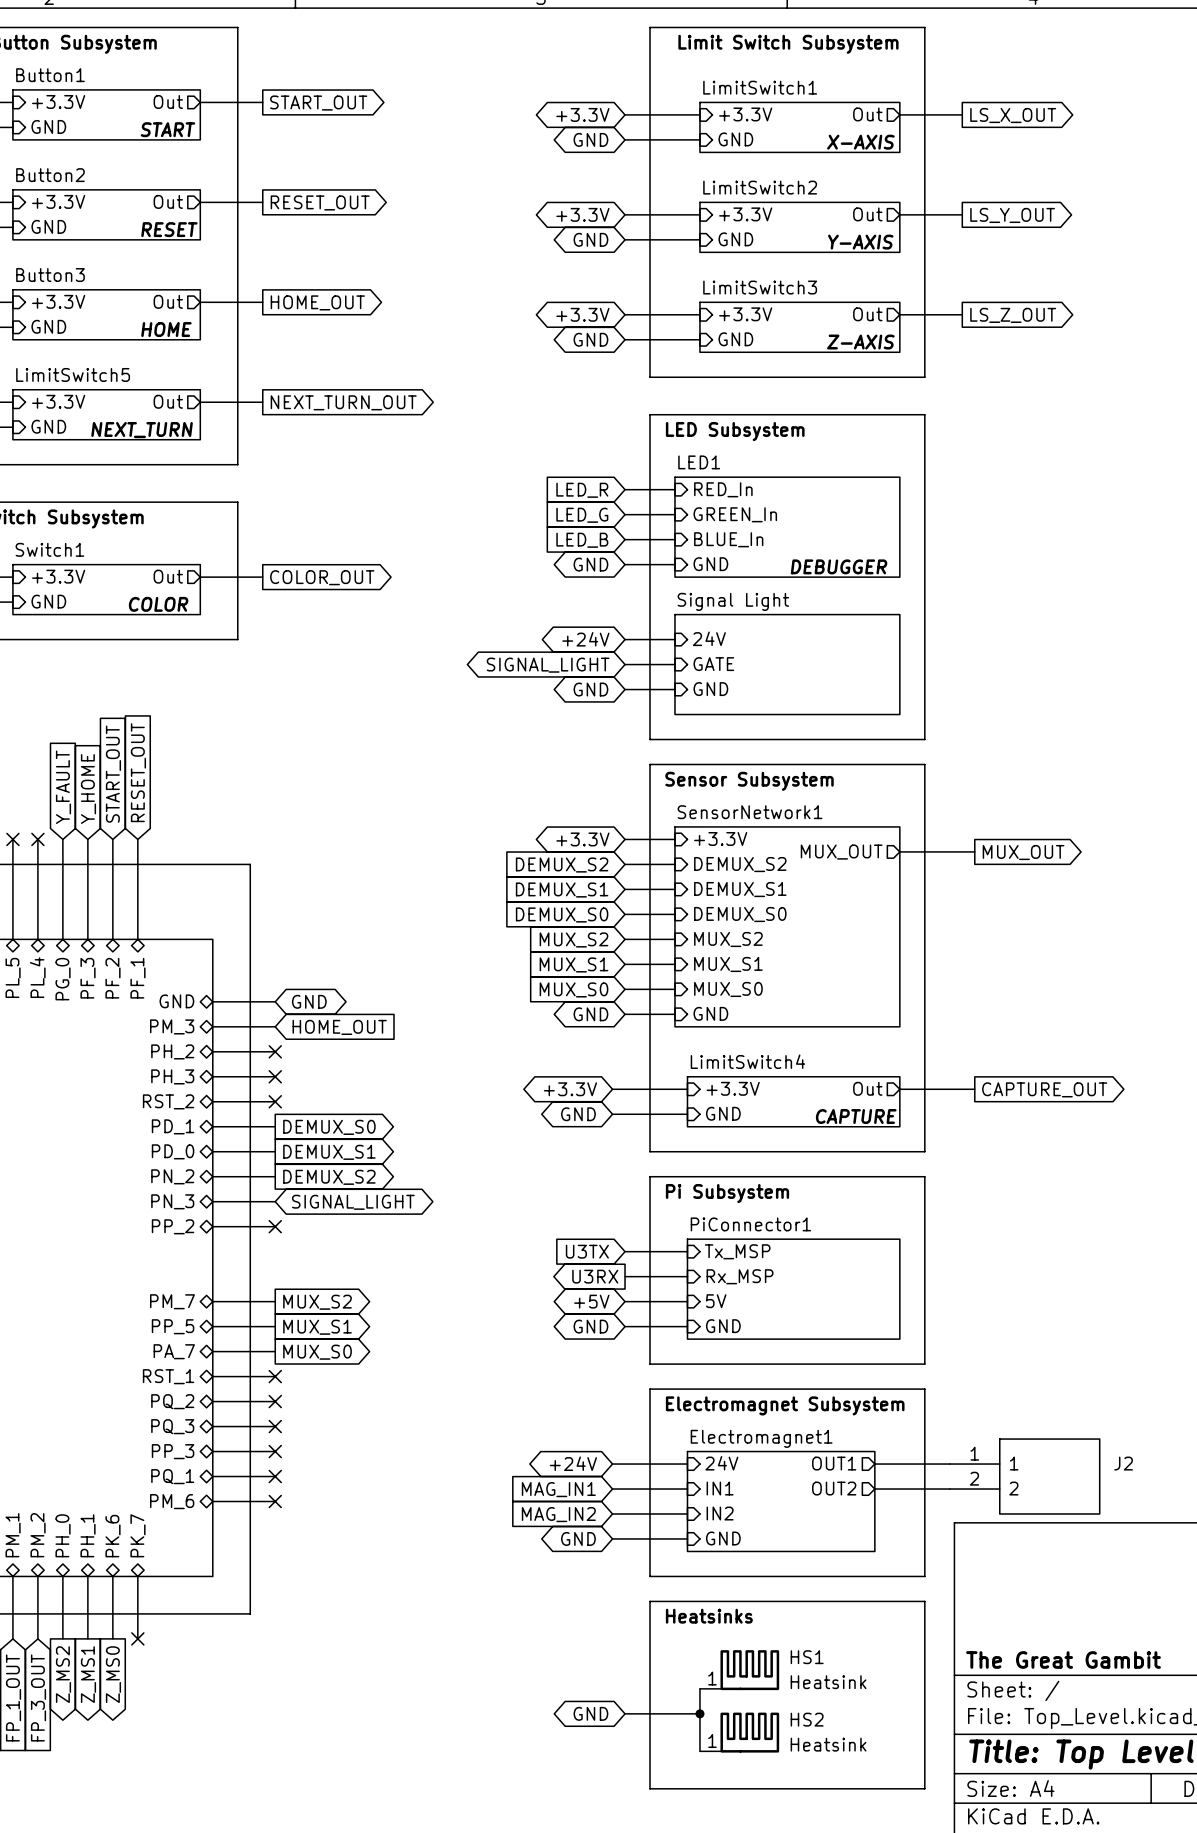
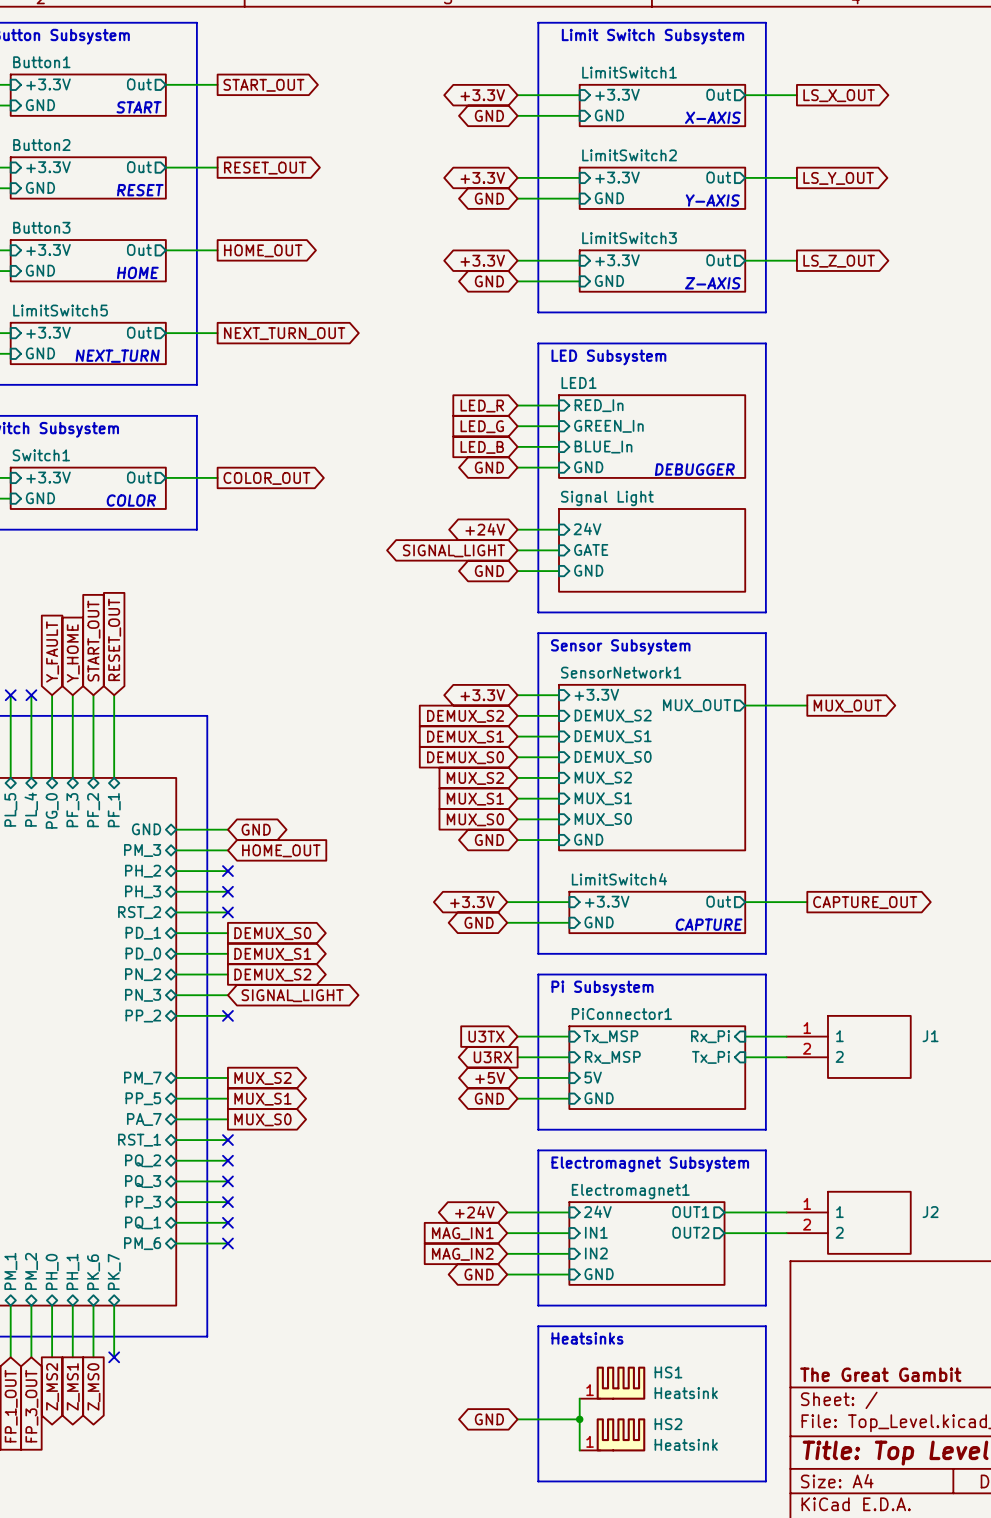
sheet pin: none -> Rx_Pi (710, 1036)
wire: none -> (745, 1036) (786, 1036)
J1: none -> (848, 1046)
sheet pin: none -> Tx_Pi (711, 1057)
wire: none -> (745, 1057) (786, 1057)

